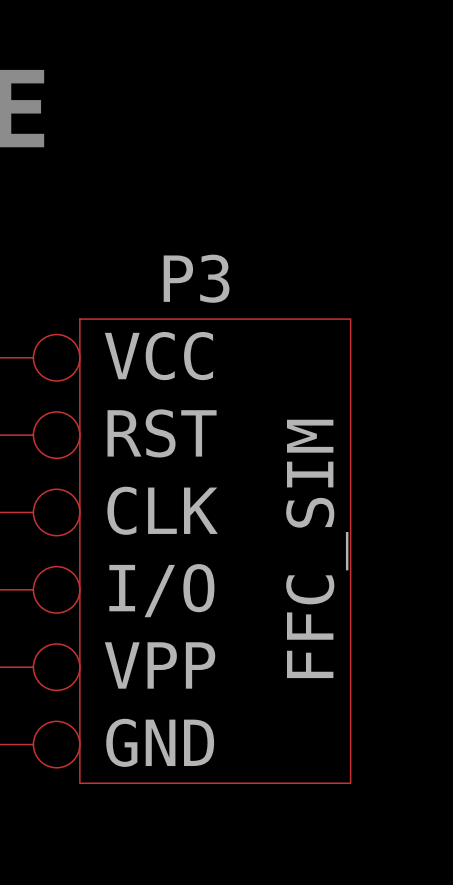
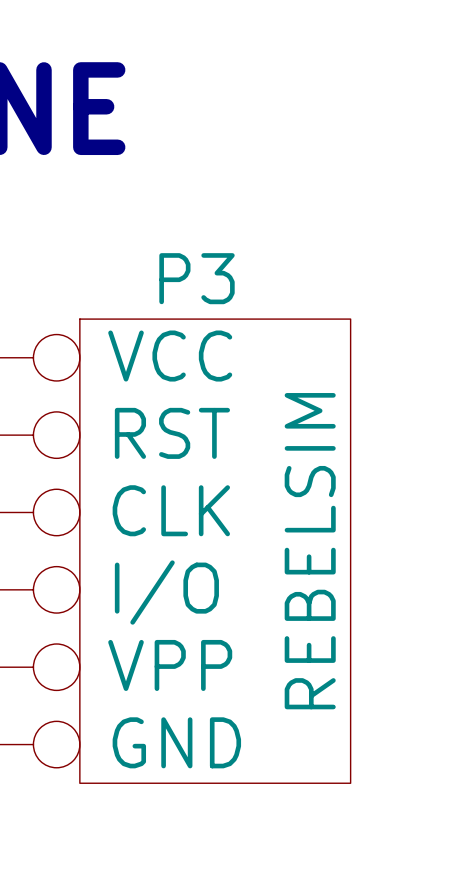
P3 value: FFC_SIM (317, 548) -> REBELSIM (310, 551)

